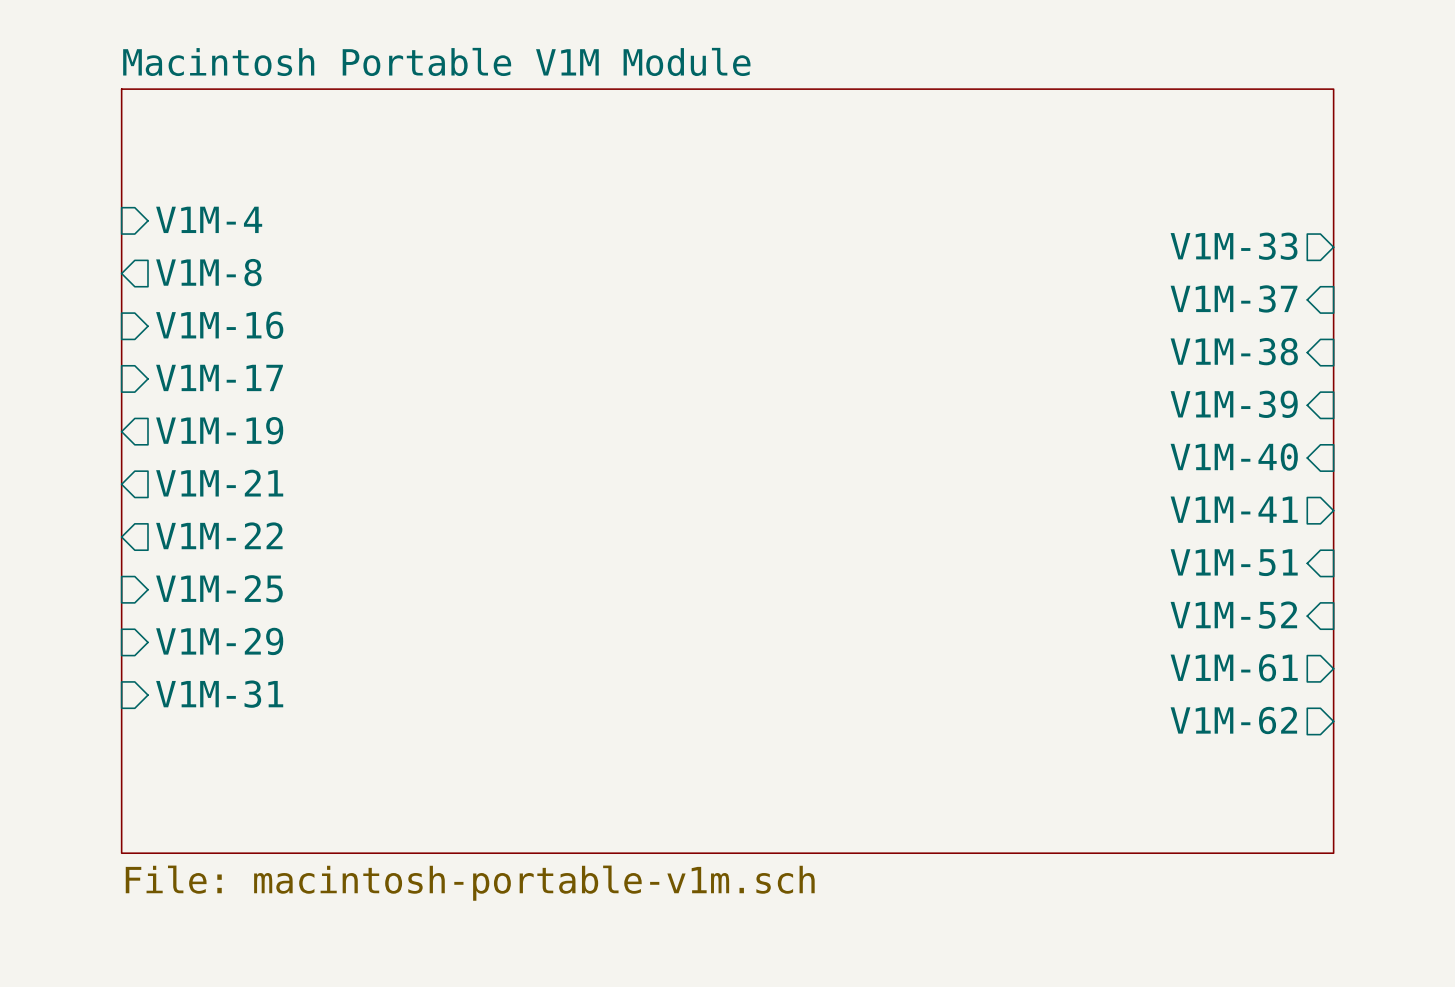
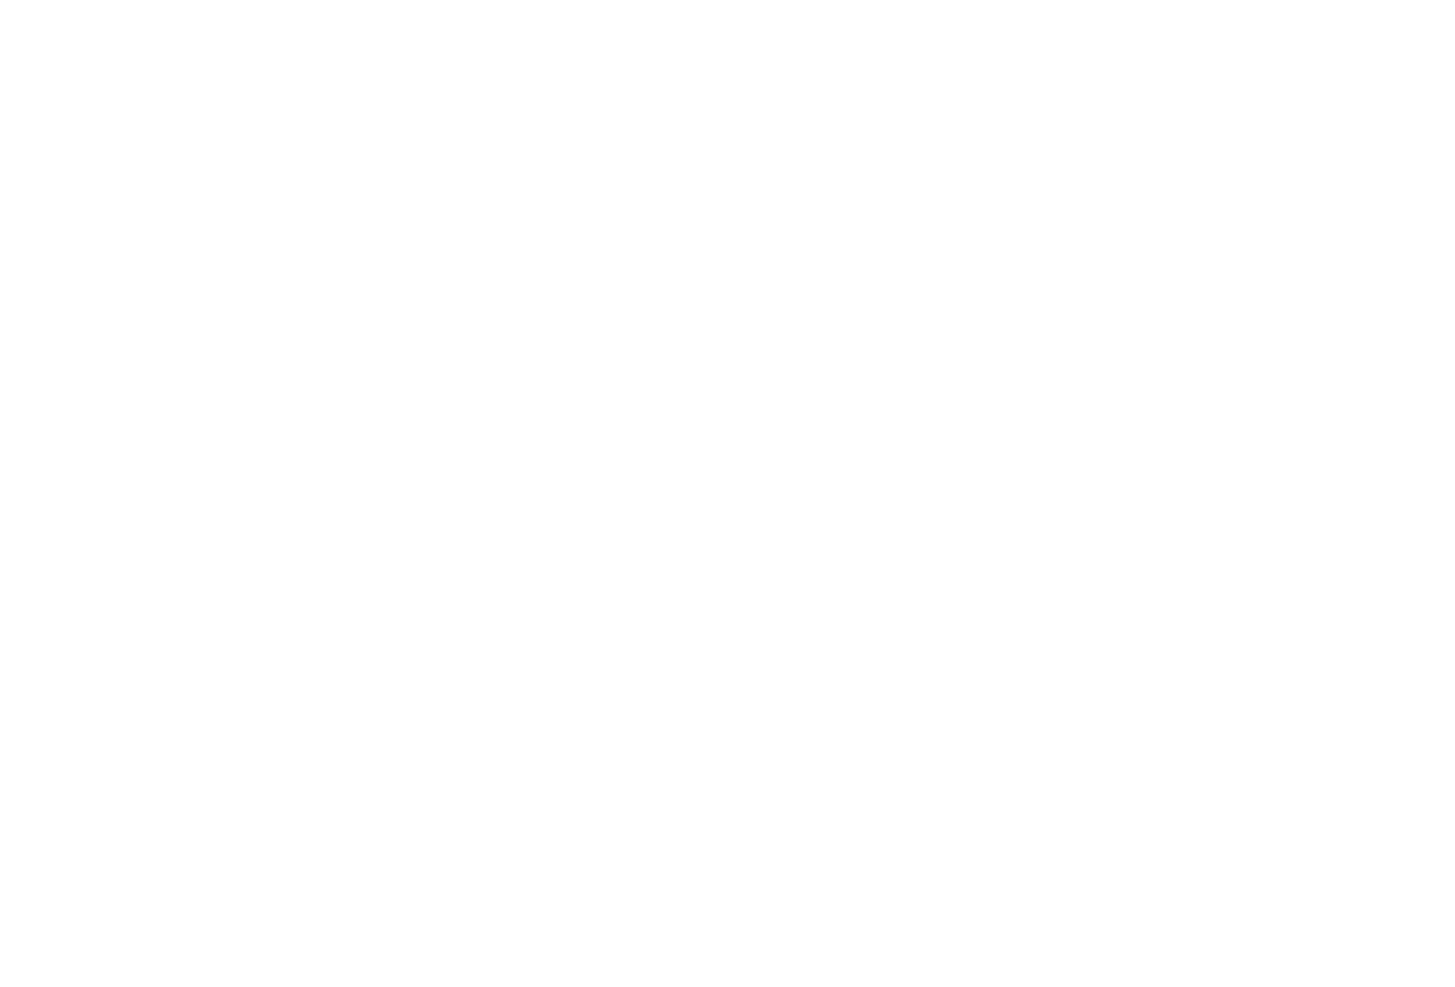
sheet pin: V1M-4 (209, 219) -> none
sheet pin: V1M-33 (1234, 246) -> none
sheet pin: V1M-8 (208, 272) -> none
sheet pin: V1M-37 (1234, 298) -> none
sheet pin: V1M-16 (219, 325) -> none
sheet pin: V1M-38 (1234, 351) -> none
sheet pin: V1M-17 (219, 377) -> none
sheet pin: V1M-39 (1234, 404) -> none
sheet pin: V1M-19 (219, 430) -> none
sheet pin: V1M-40 (1234, 457) -> none
sheet Macintosh Portable V1M Module: File: macintosh-portable-v1m.sch (727, 471) -> none
sheet pin: V1M-21 (219, 483) -> none
sheet pin: V1M-41 (1234, 509) -> none
sheet pin: V1M-22 (219, 535) -> none
sheet pin: V1M-51 (1234, 562) -> none
sheet pin: V1M-25 (219, 588) -> none
sheet pin: V1M-52 (1233, 615) -> none
sheet pin: V1M-29 (219, 641) -> none
sheet pin: V1M-61 (1234, 667) -> none
sheet pin: V1M-31 (219, 694) -> none
sheet pin: V1M-62 (1233, 720) -> none

